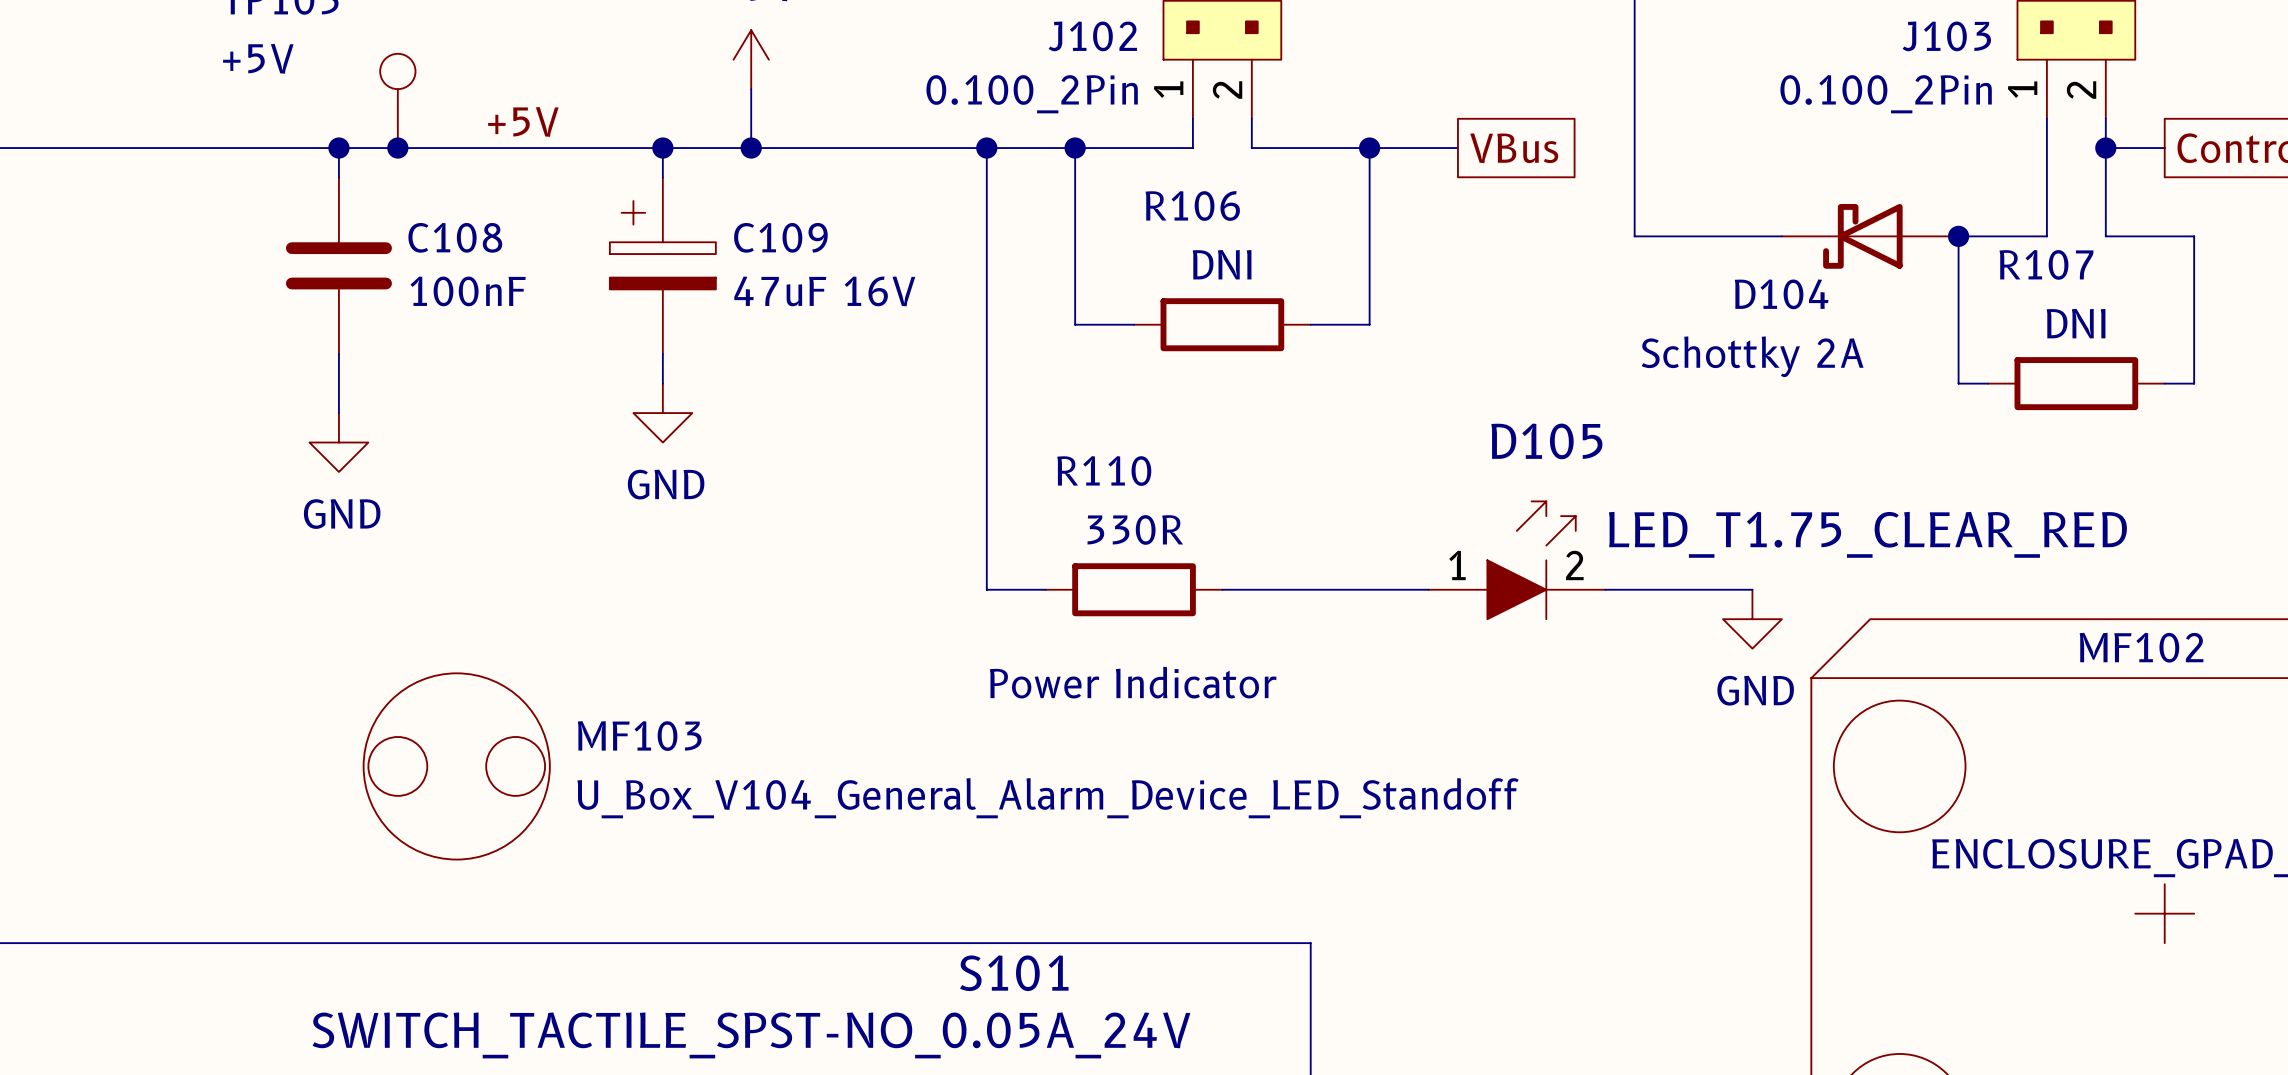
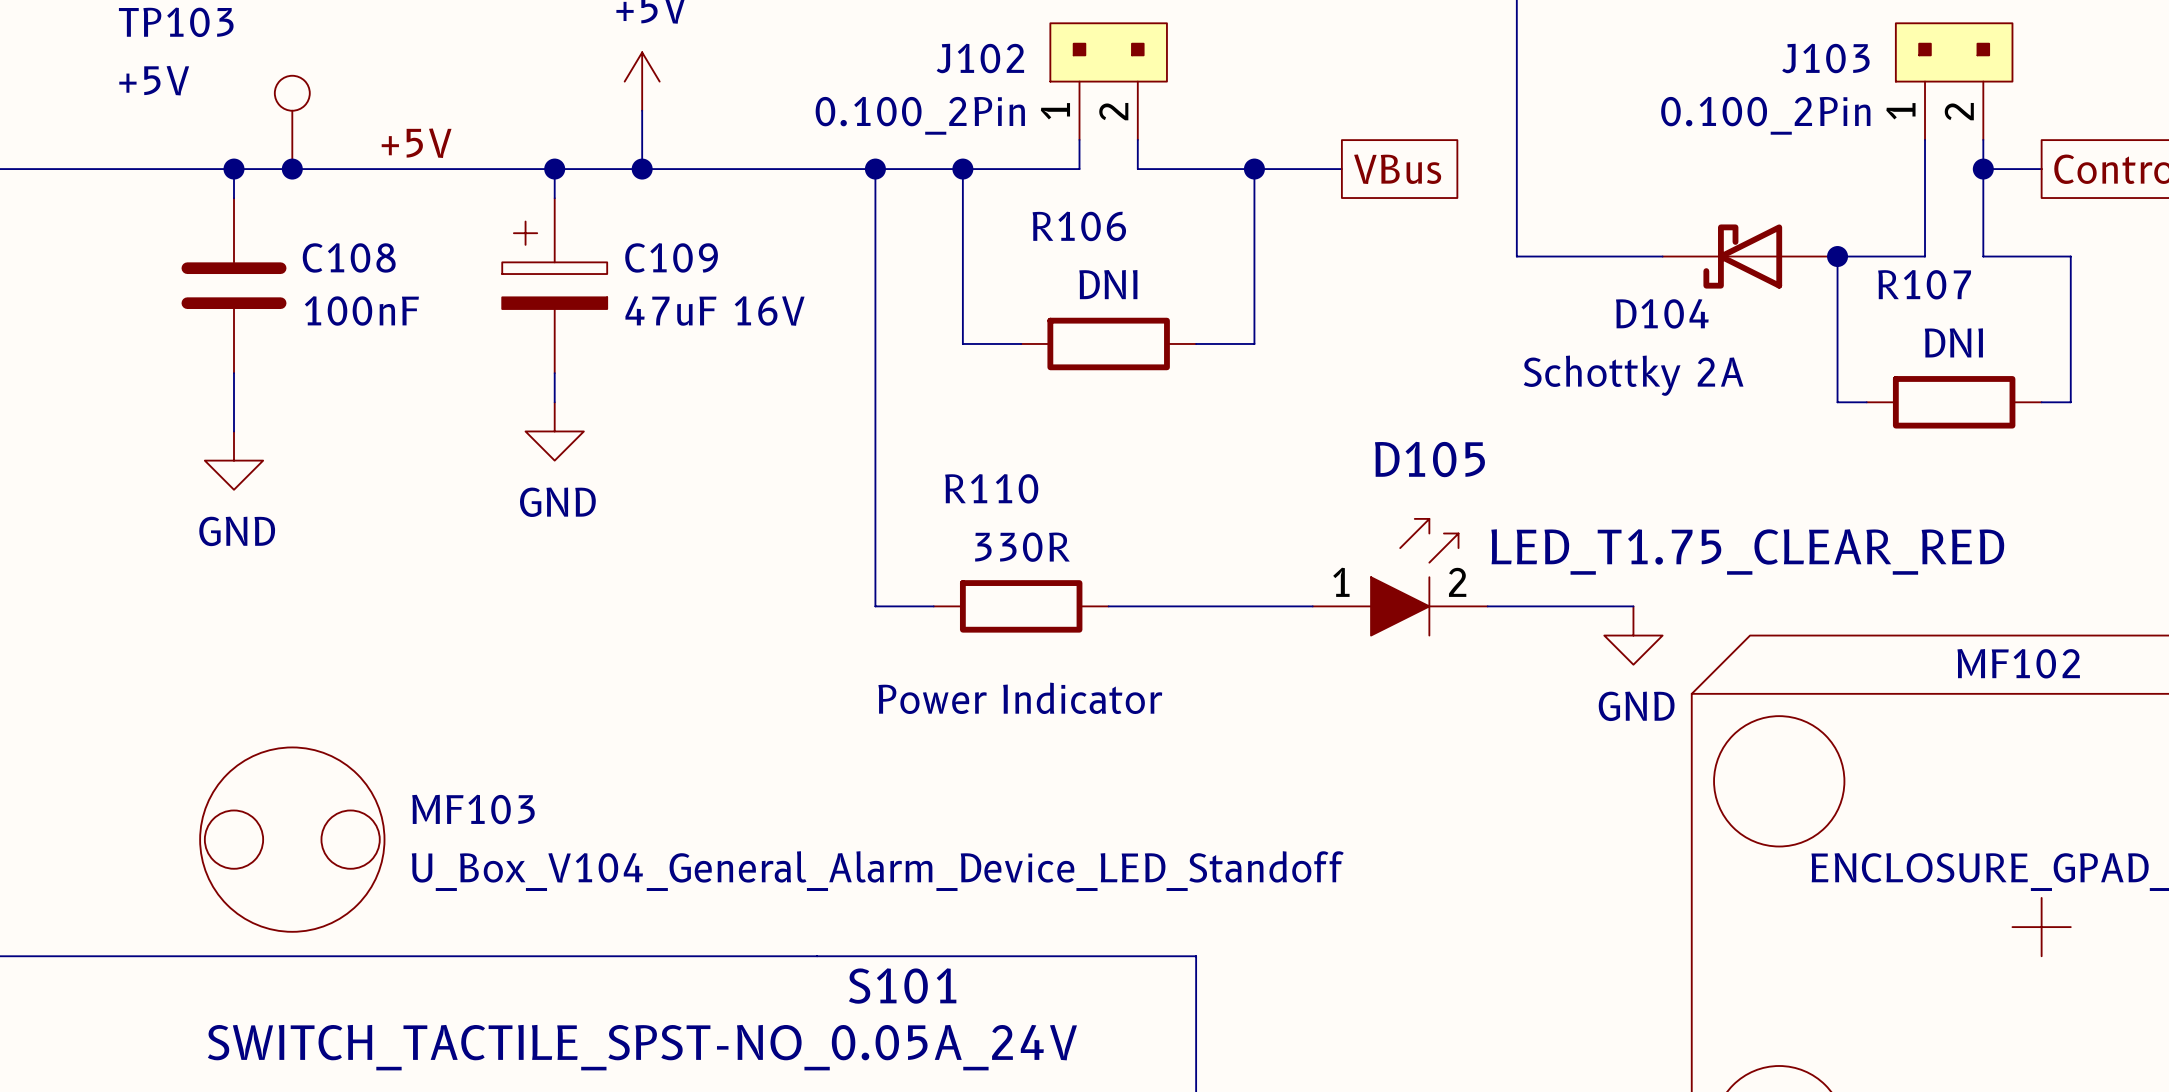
MF103 position: (456, 766) -> (292, 839)

